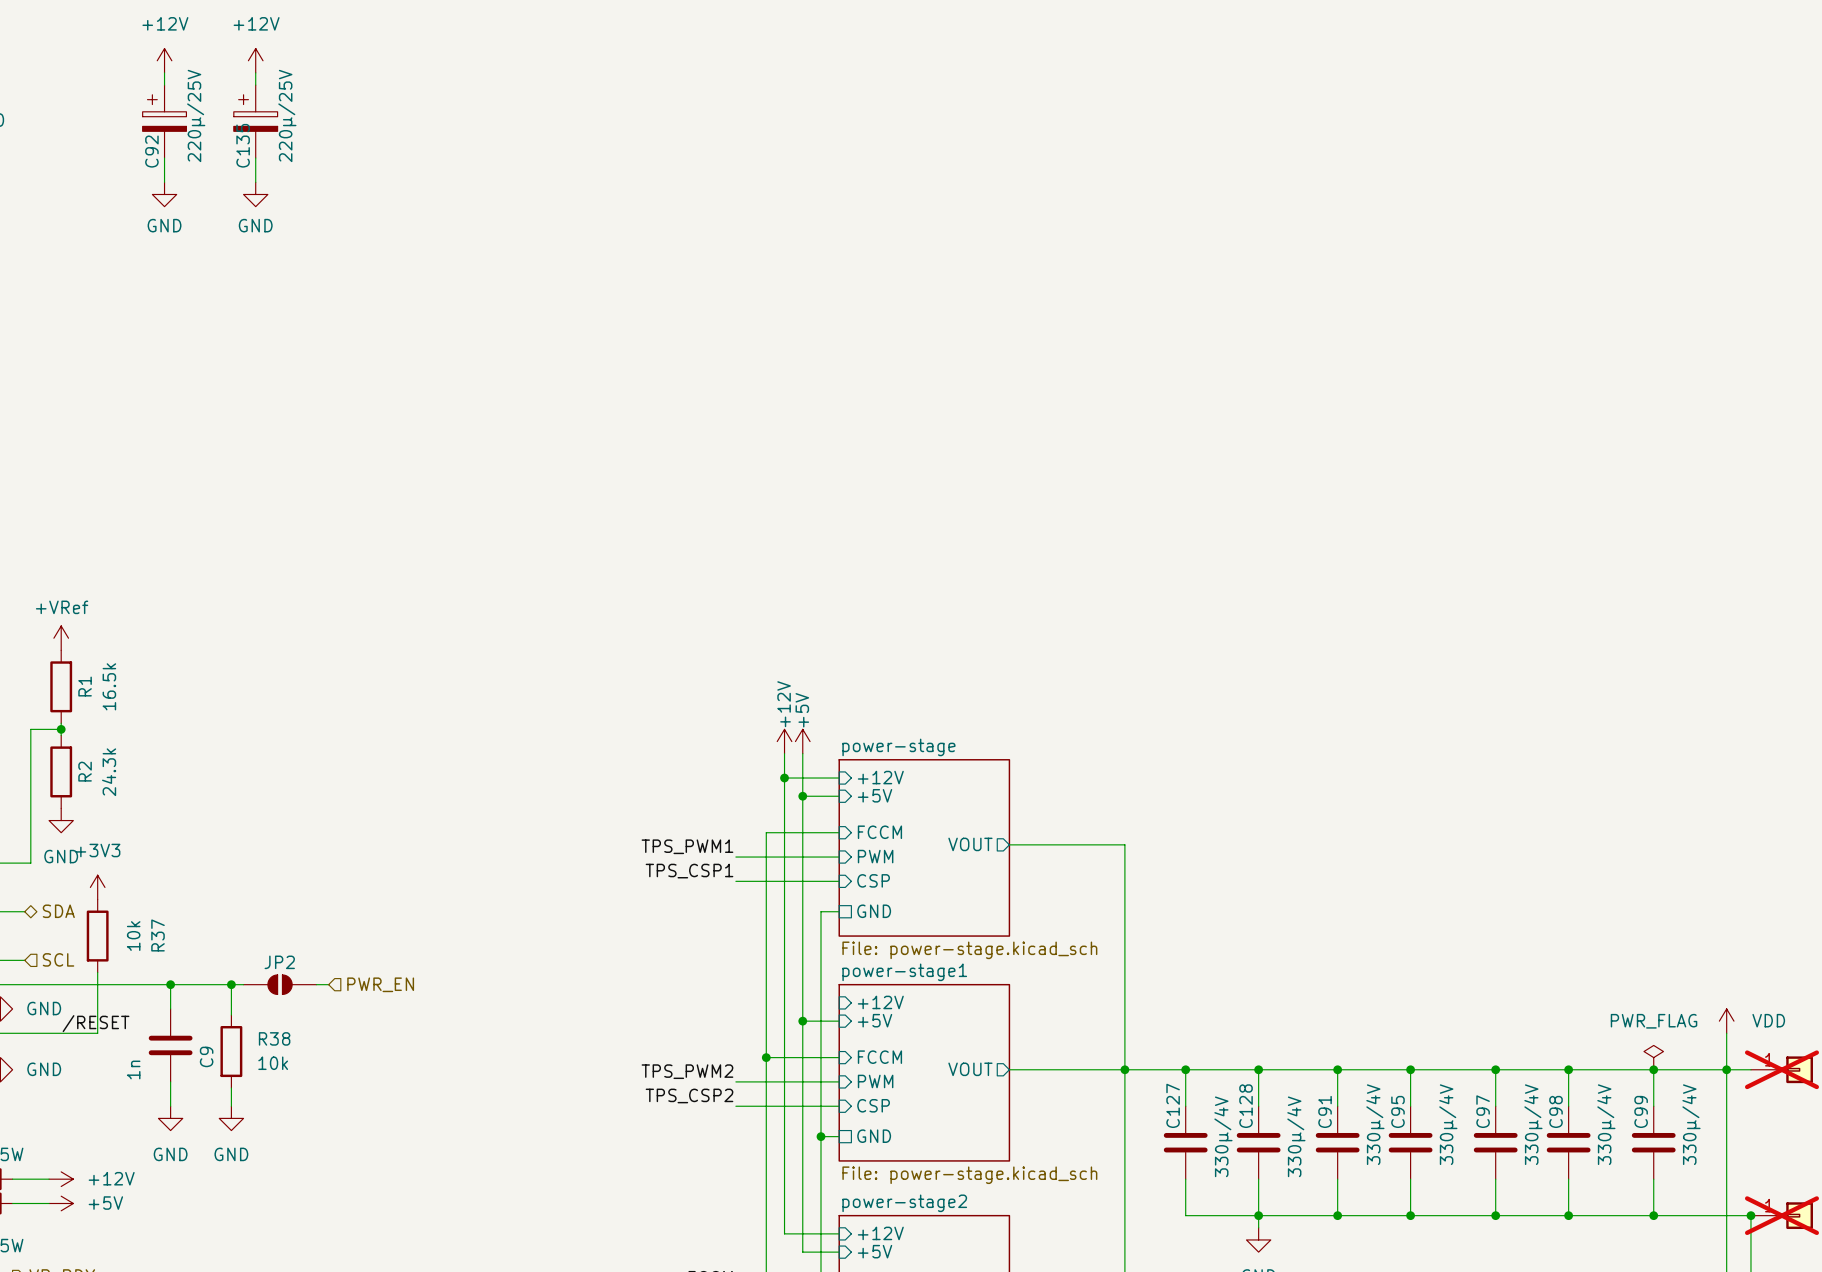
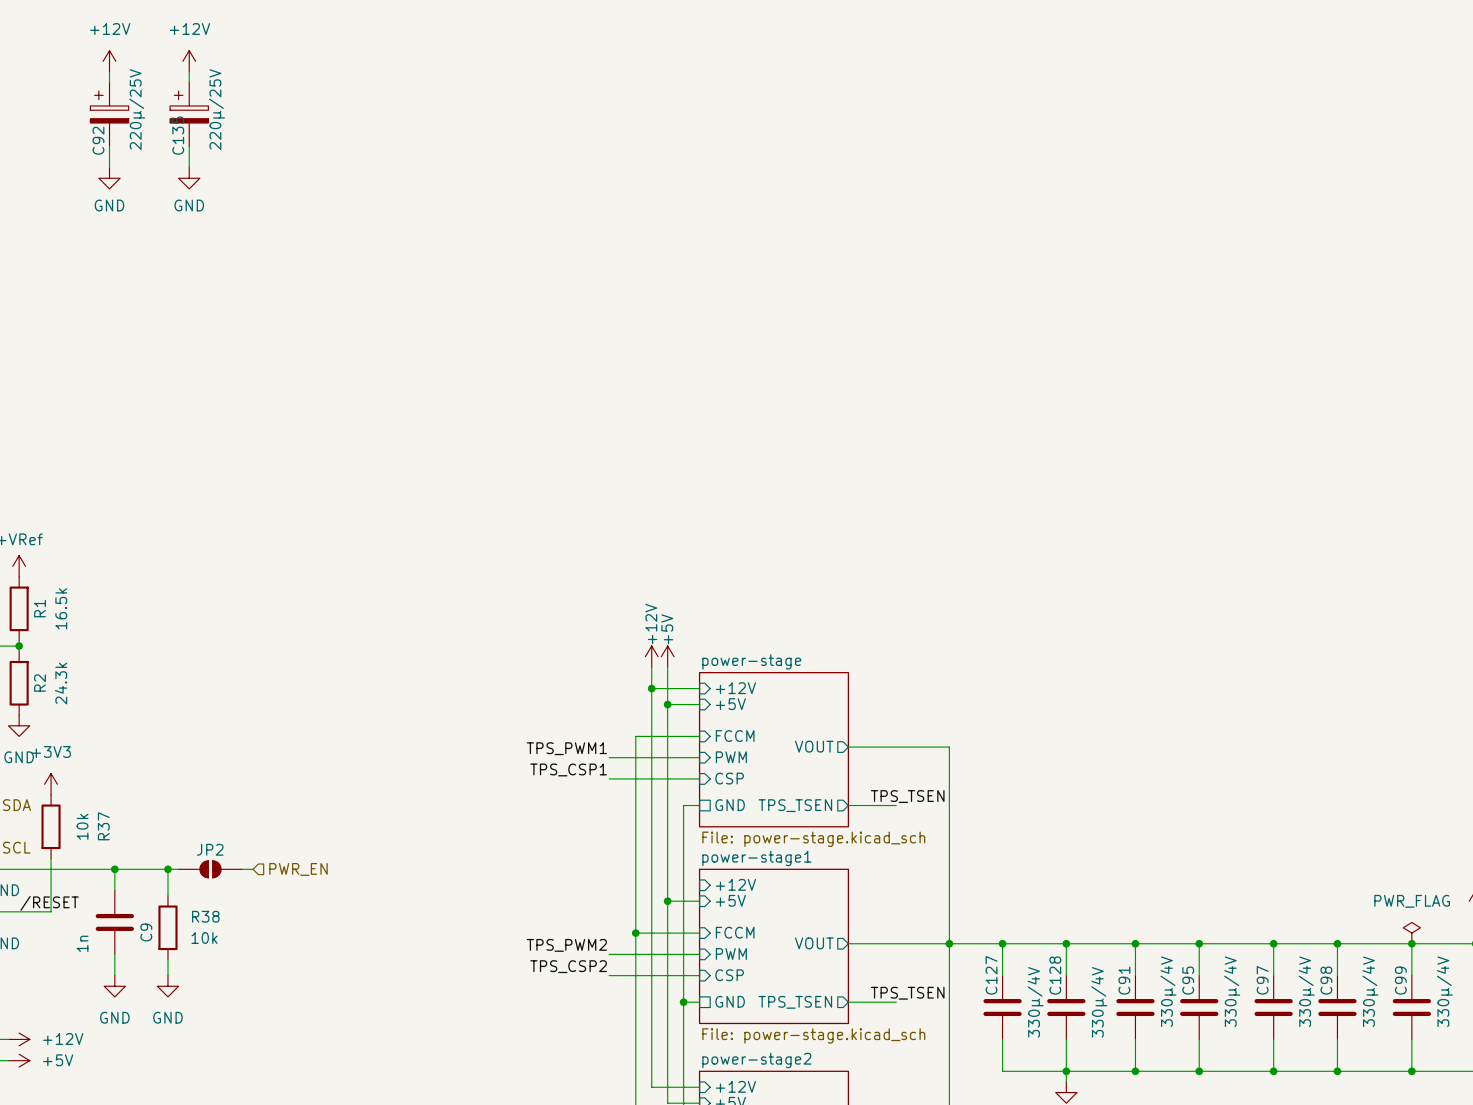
label: none -> TPS_TSEN (907, 796)
sheet pin: none -> TPS_TSEN (795, 805)
wire: none -> (848, 805) (896, 805)
label: none -> TPS_TSEN (907, 993)
sheet pin: none -> TPS_TSEN (795, 1002)
wire: none -> (848, 1002) (896, 1002)

